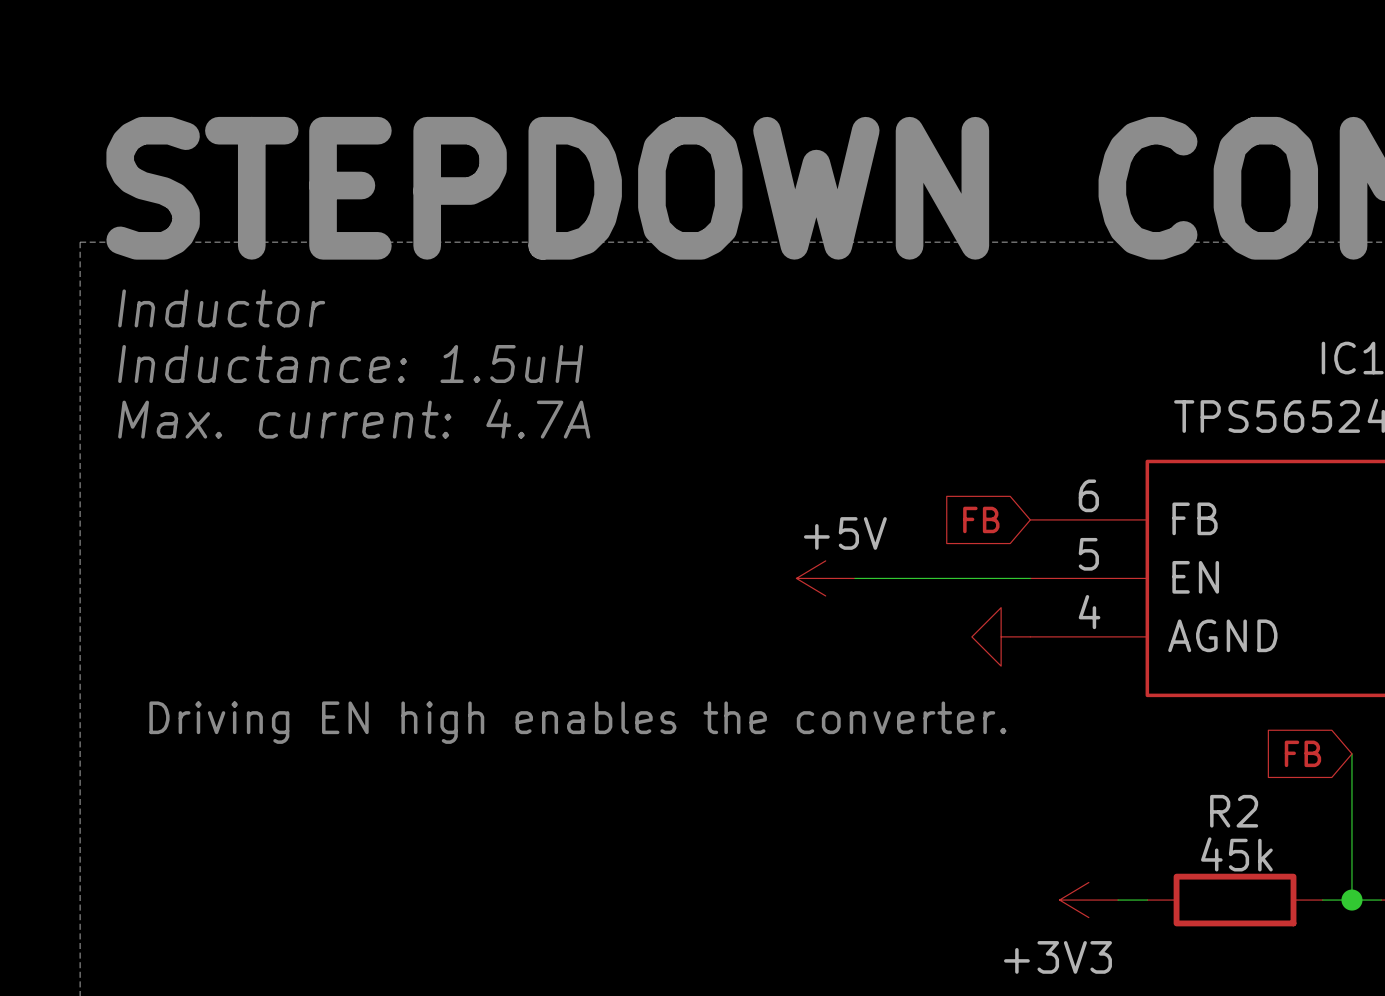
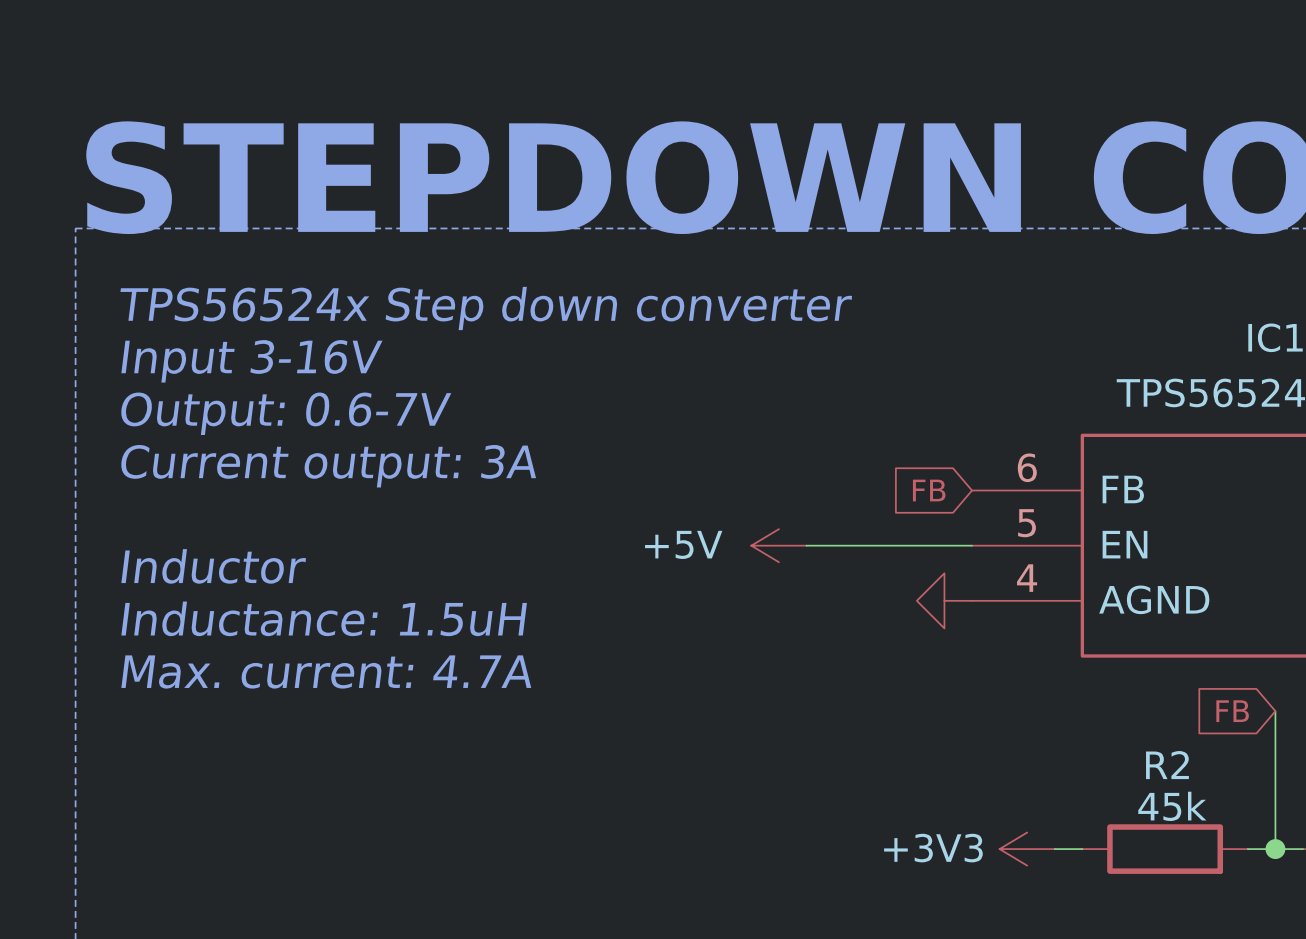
text: Inductor (221, 308) -> TPS56524x Step down converter (486, 308)
text: Inductance: 1.5uH (350, 364) -> Input 3-16V (251, 361)
text: Max. current: 4.7A (354, 418) -> Output: 0.6-7V (285, 413)
text: none -> Current output: 3A (328, 466)
power symbol text position: +5V (845, 533) -> +5V (683, 544)
text: none -> Inductor (213, 566)
text: none -> Inductance: 1.5uH (324, 618)
text: none -> Max. current: 4.7A (326, 671)
text: Driving EN high enables the converter. (577, 722) -> none
power symbol text position: +3V3 (1057, 957) -> +3V3 (933, 848)

